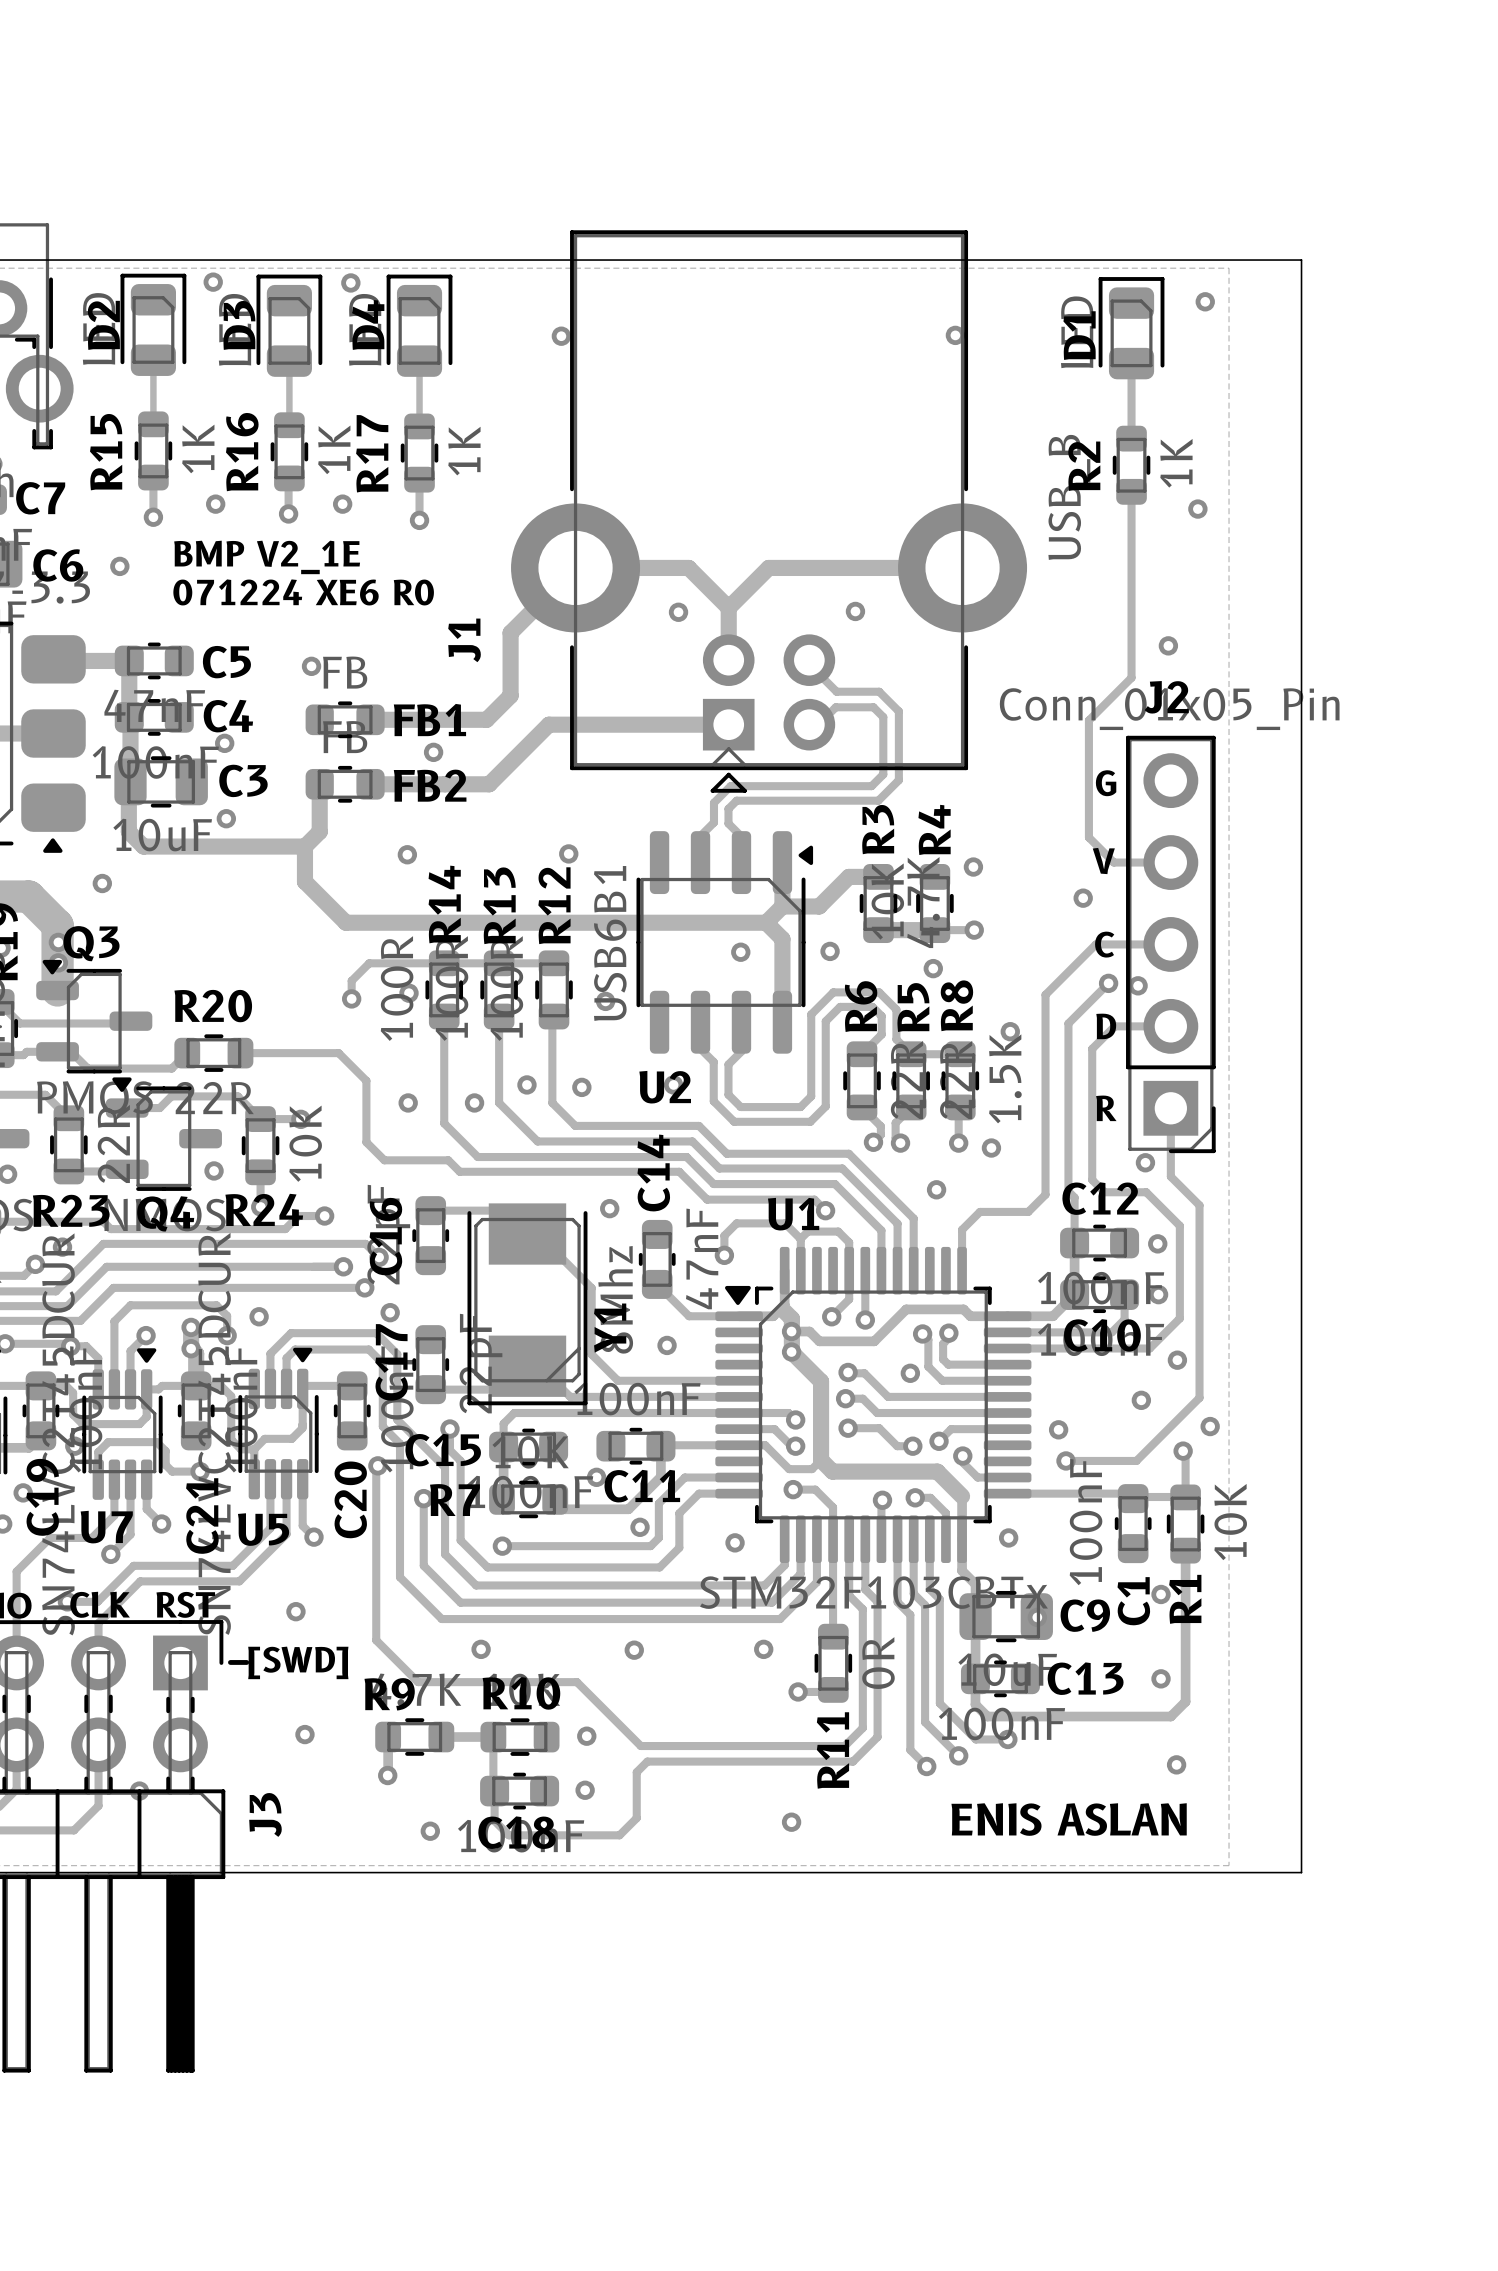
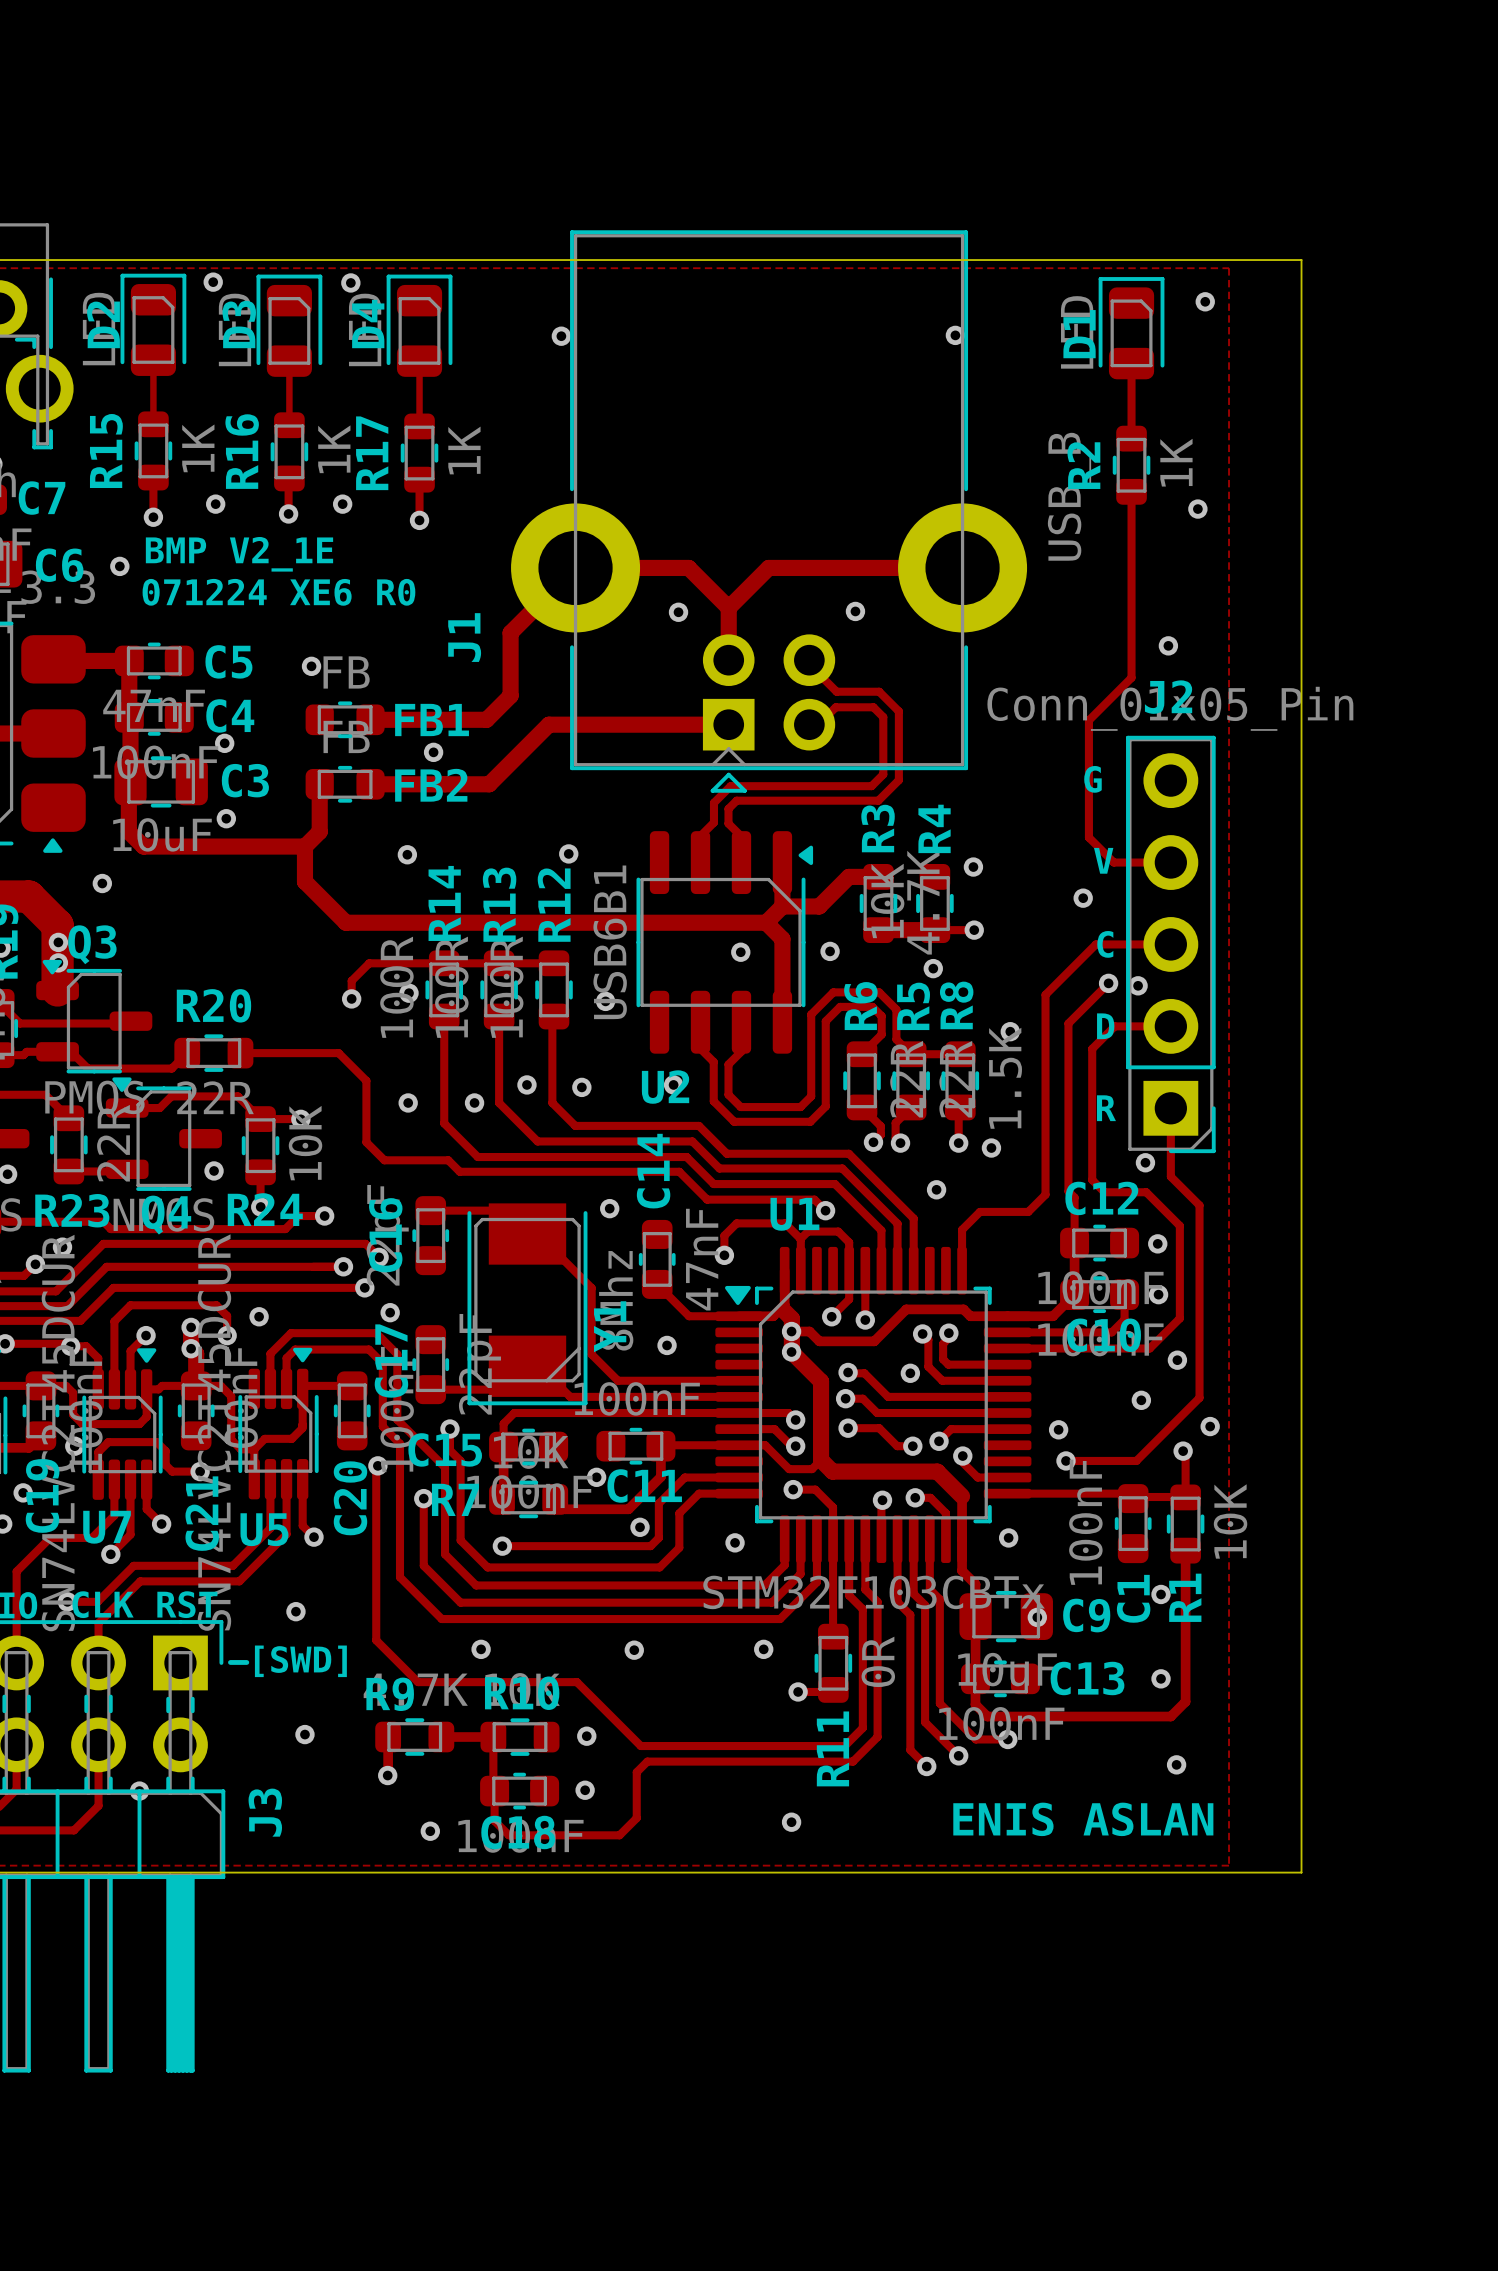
text position: BMP V2_1E (267, 557) -> BMP V2_1E (239, 554)
text position: 071224 XE6 R0 (303, 592) -> 071224 XE6 R0 (278, 592)
text position: G (1106, 783) -> G (1092, 779)

